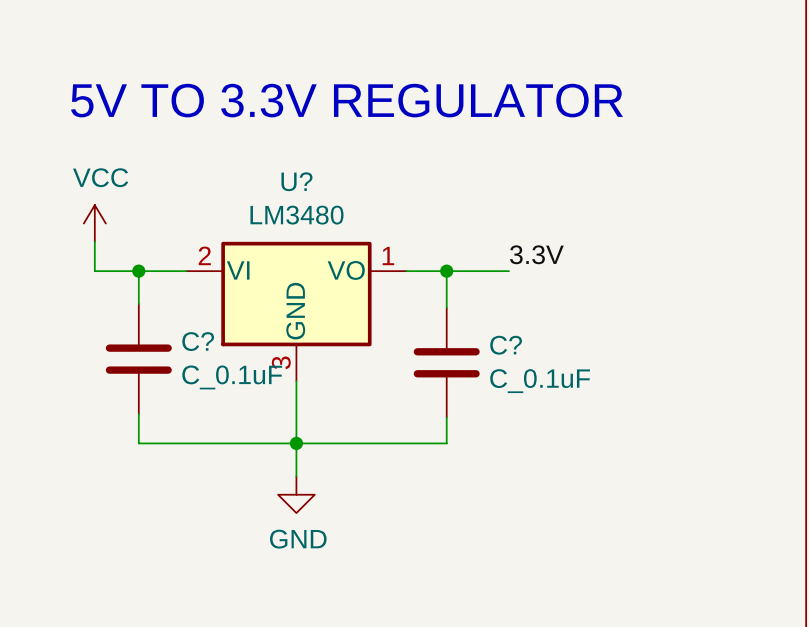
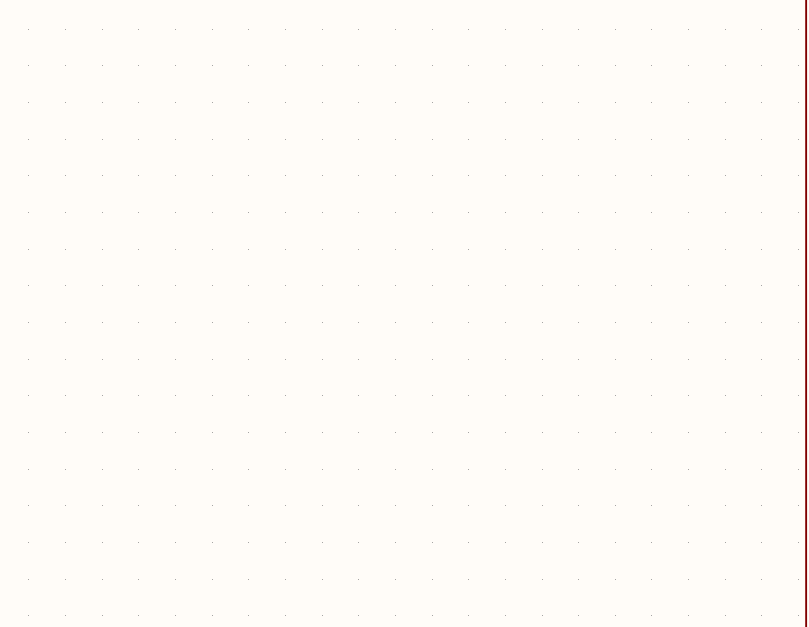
text: 5V TO 3.3V REGULATOR (347, 100) -> none
power symbol: VCC (94, 223) -> none
wire: (94, 241) (94, 271) (186, 271) -> none
label: 3.3V (536, 254) -> none
wire: (138, 271) (138, 304) -> none
junction: (138, 271) -> none
wire: (406, 271) (509, 271) -> none
wire: (446, 271) (446, 307) -> none
junction: (446, 271) -> none
U?: LM3480 (296, 311) -> none
C?: C_0.1uF (138, 359) -> none
C?: C_0.1uF (446, 362) -> none
wire: (296, 381) (296, 476) -> none
wire: (138, 414) (138, 443) (446, 443) (446, 417) -> none
junction: (296, 443) -> none
power symbol: GND (296, 494) -> none

